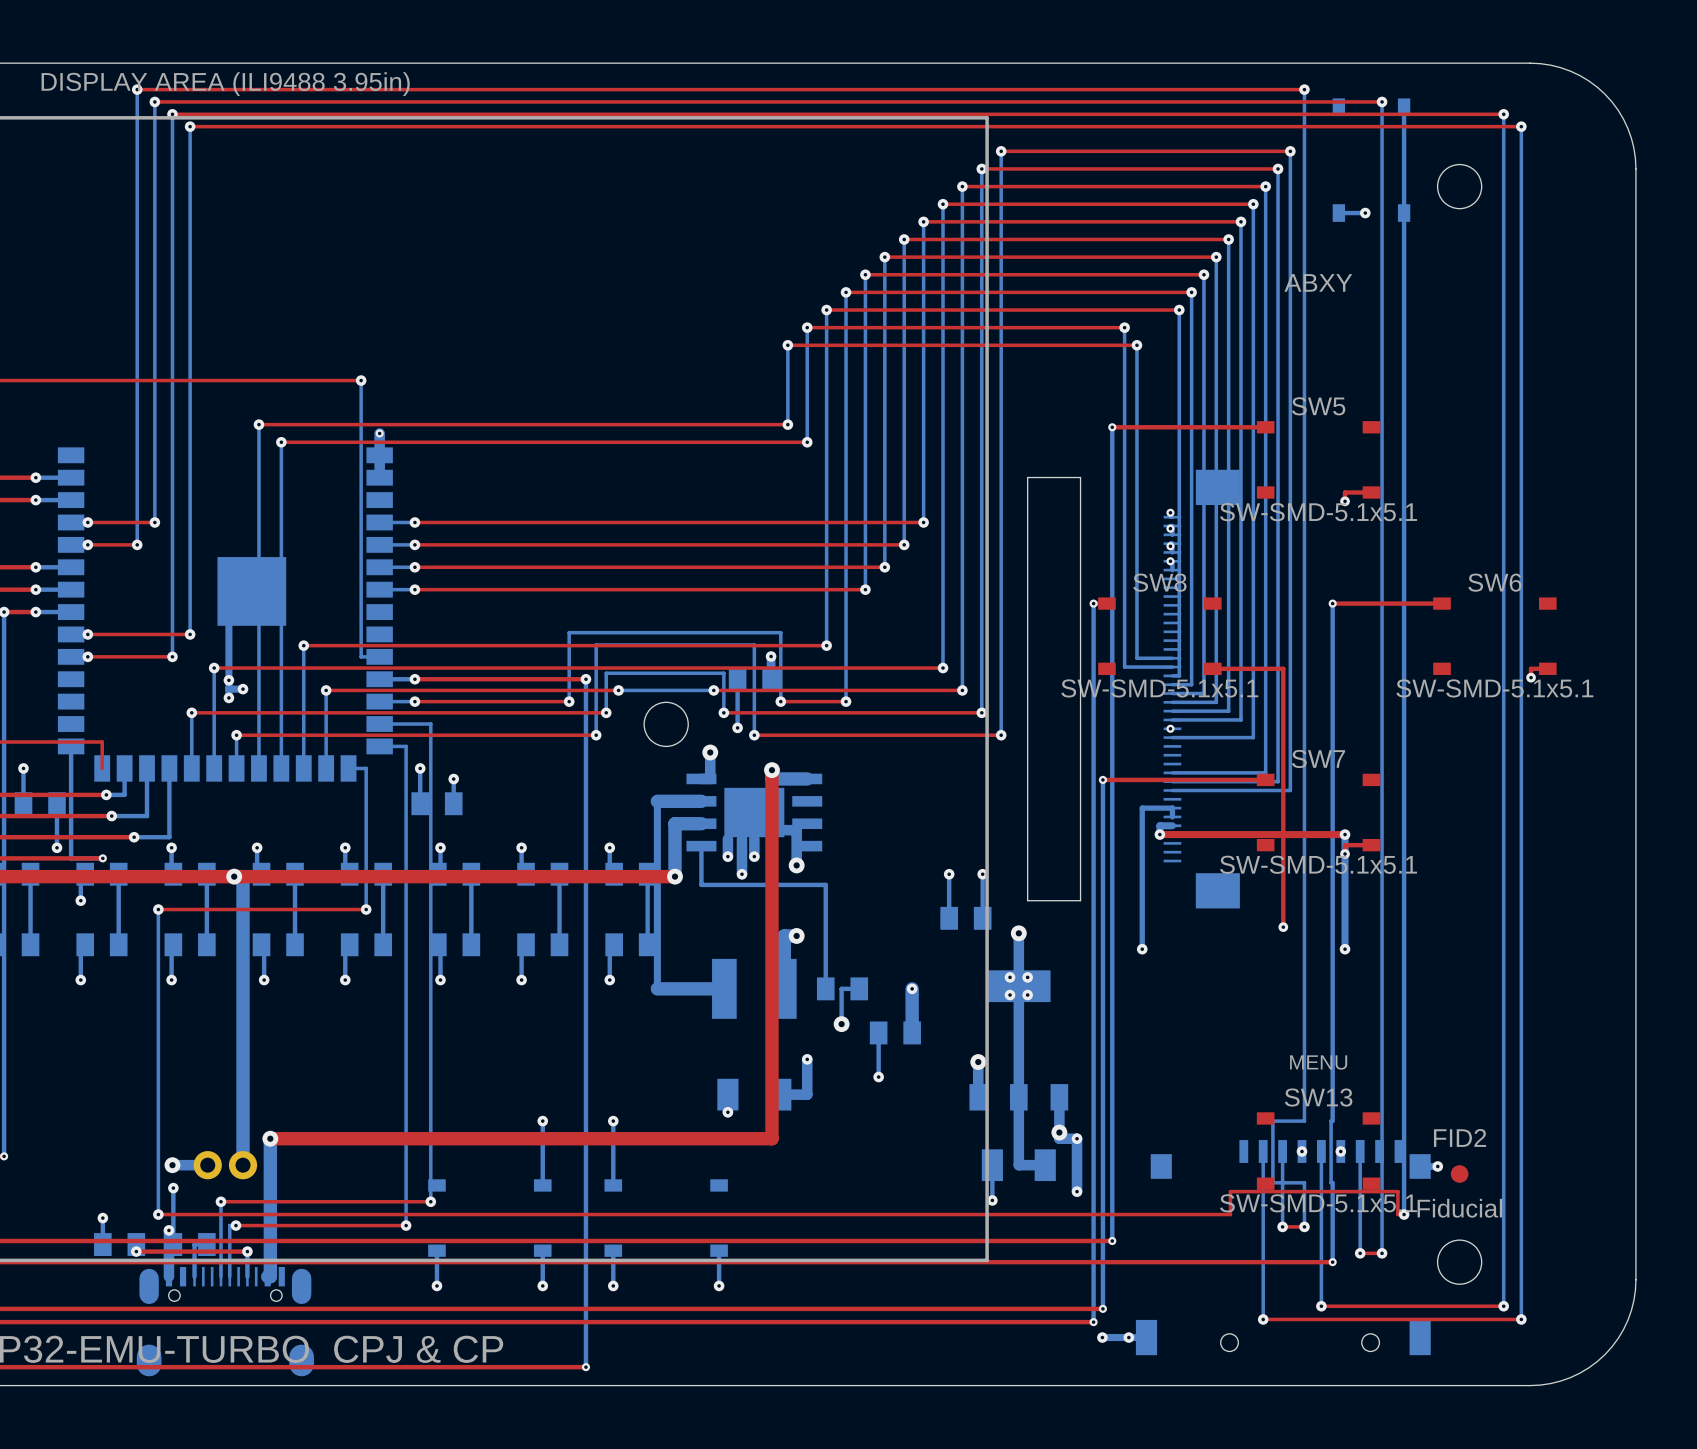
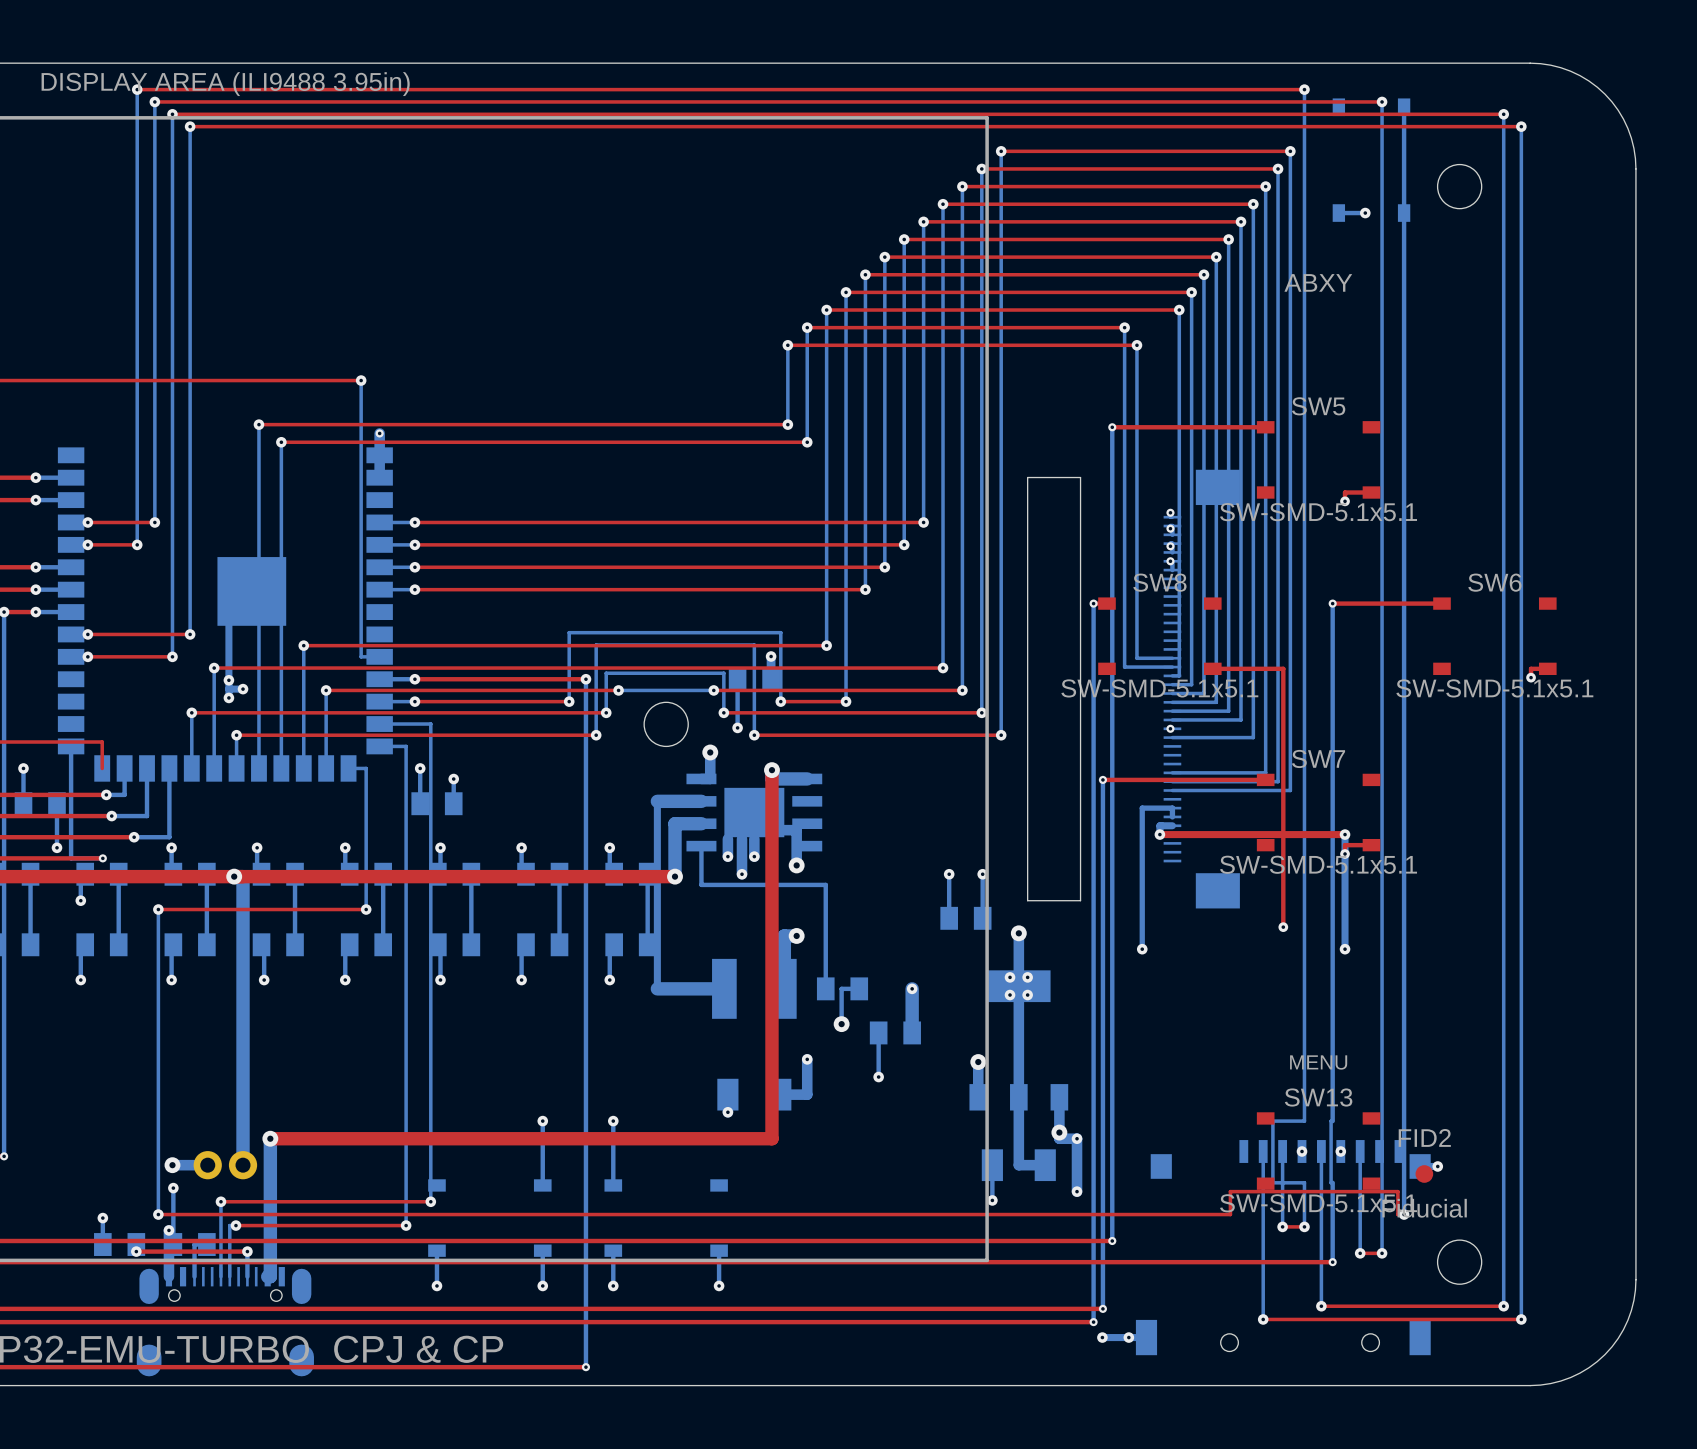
FID2 position: (1459, 1173) -> (1424, 1173)

